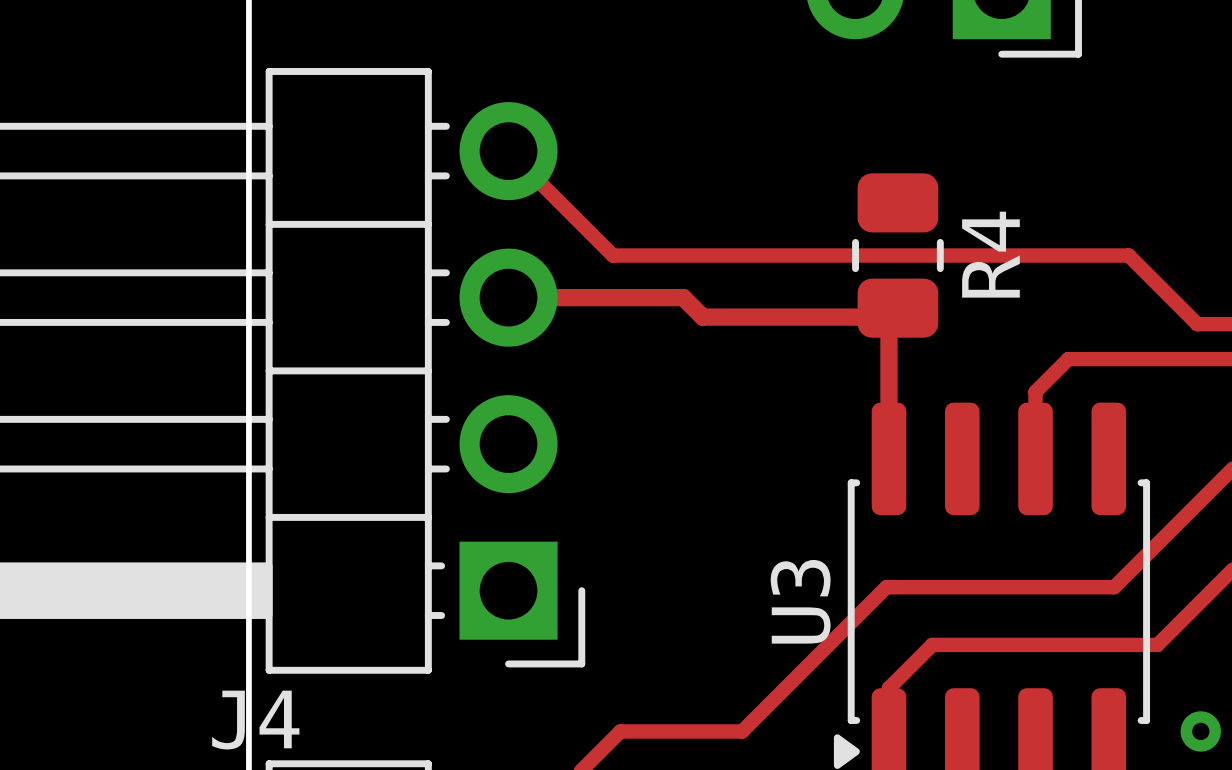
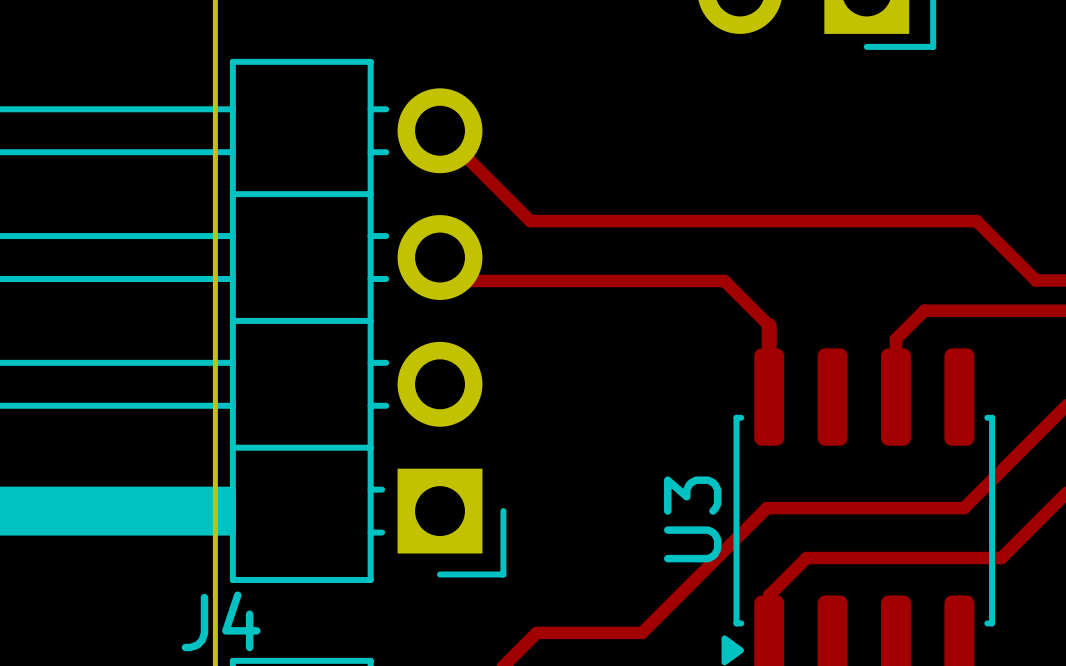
R4: (897, 255) -> none
track: (508, 297) (683, 297) (702, 317) (888, 317) -> (440, 257) (463, 280) (724, 280) (769, 325)
track: (888, 317) (888, 376) -> none
via: (1200, 731) -> none

